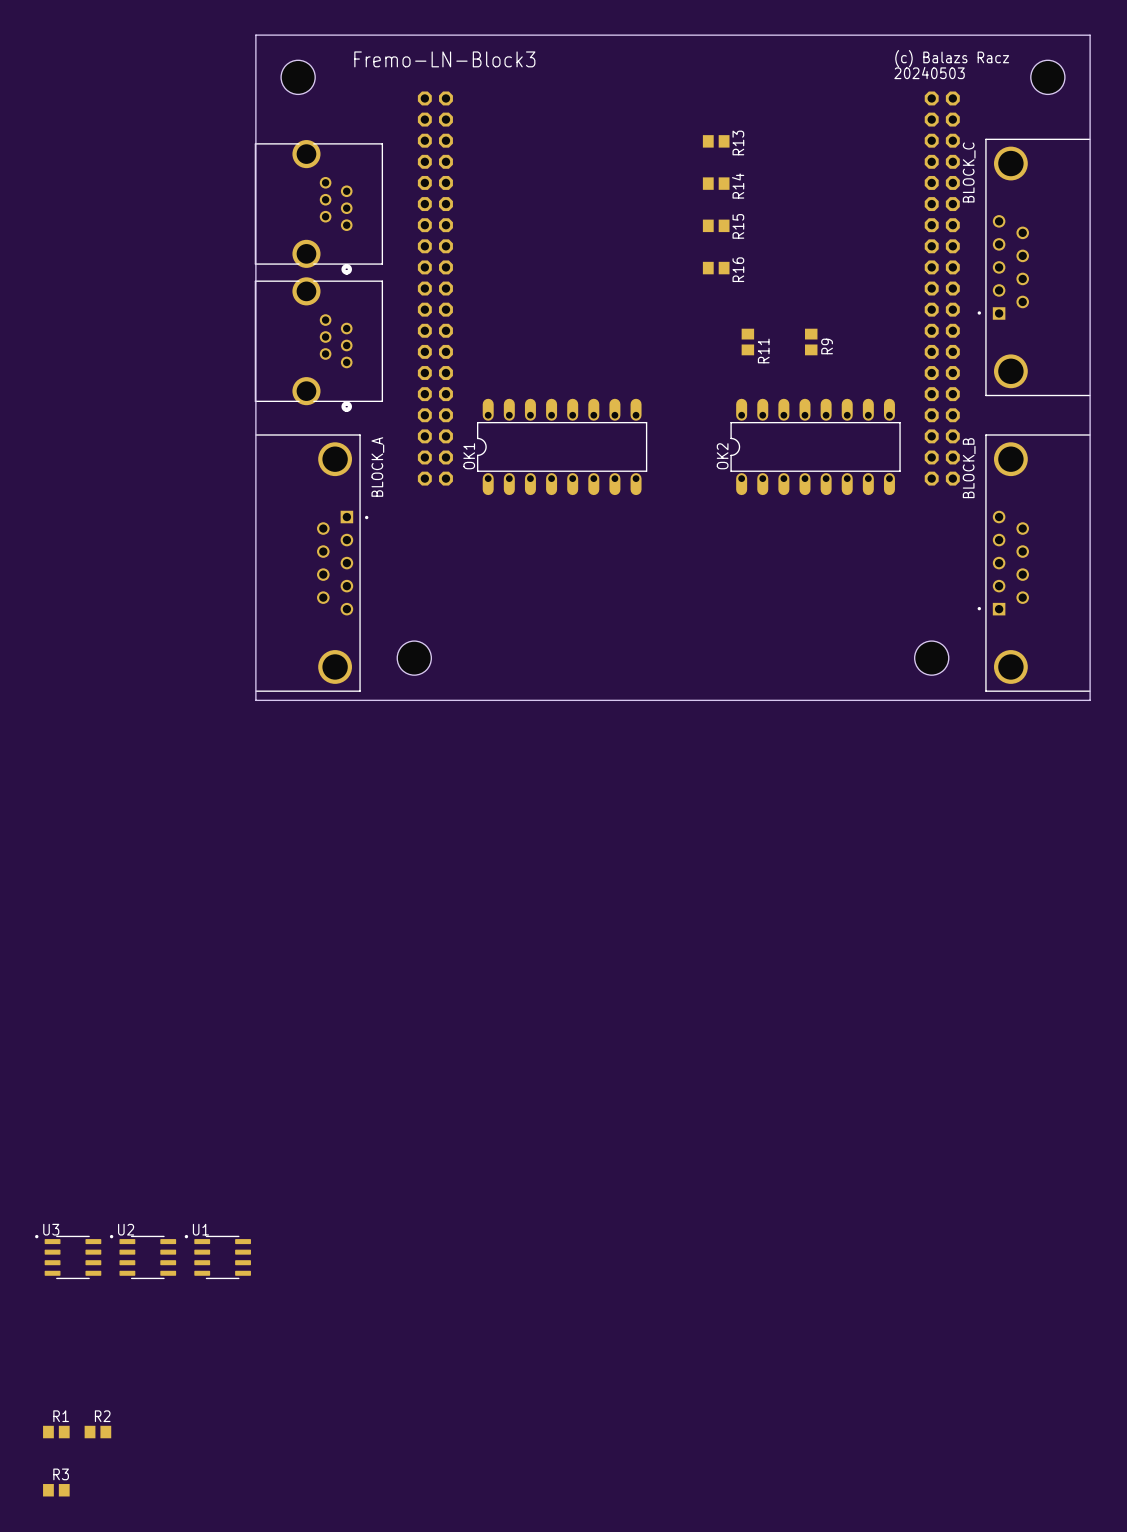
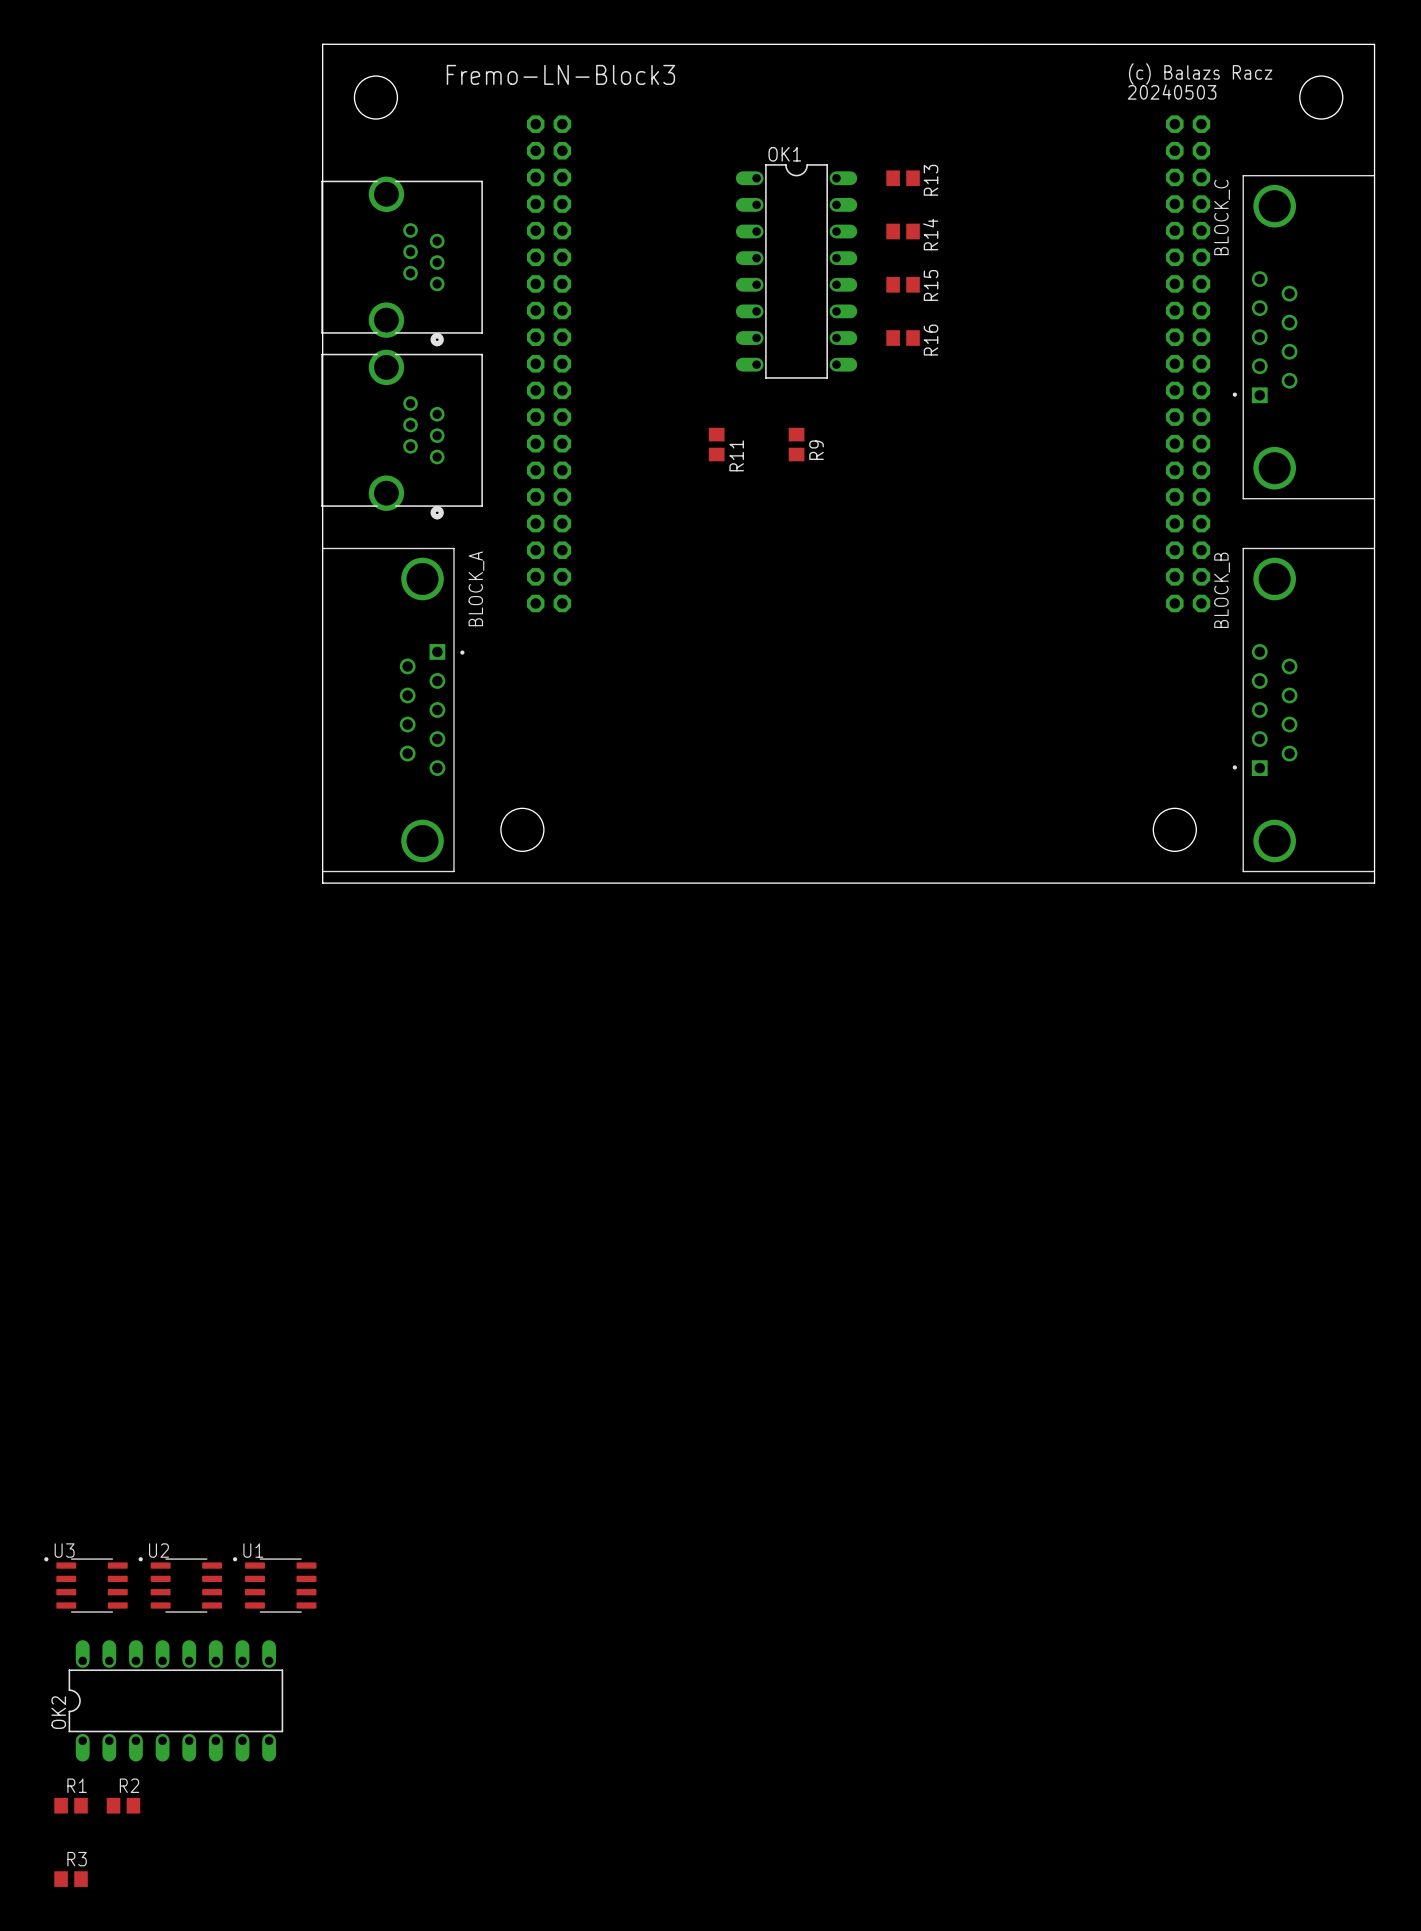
R11 position: (747, 342) -> (716, 444)
R9 position: (811, 342) -> (796, 444)
OK1 rotation: 0° (562, 446) -> 90° clockwise (796, 271)
OK1 position: (562, 446) -> (796, 271)
OK2 position: (815, 446) -> (175, 1700)

